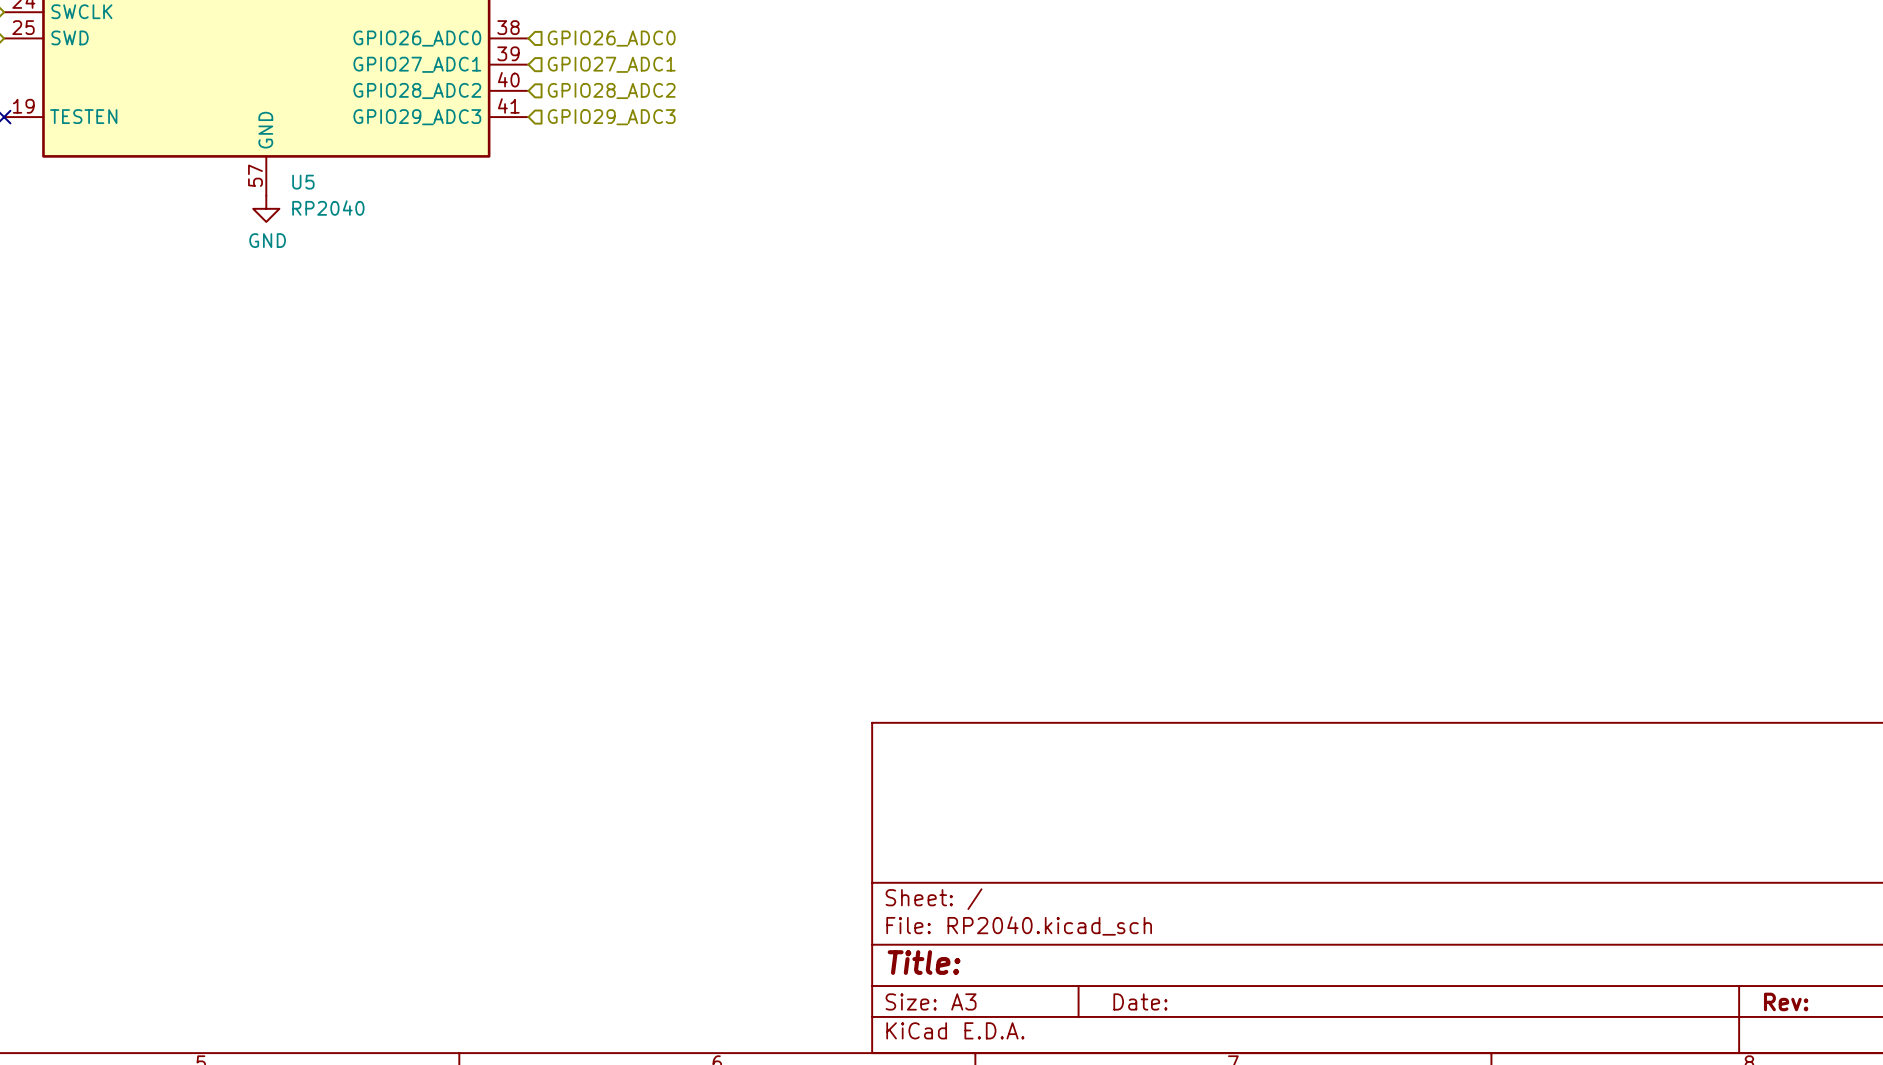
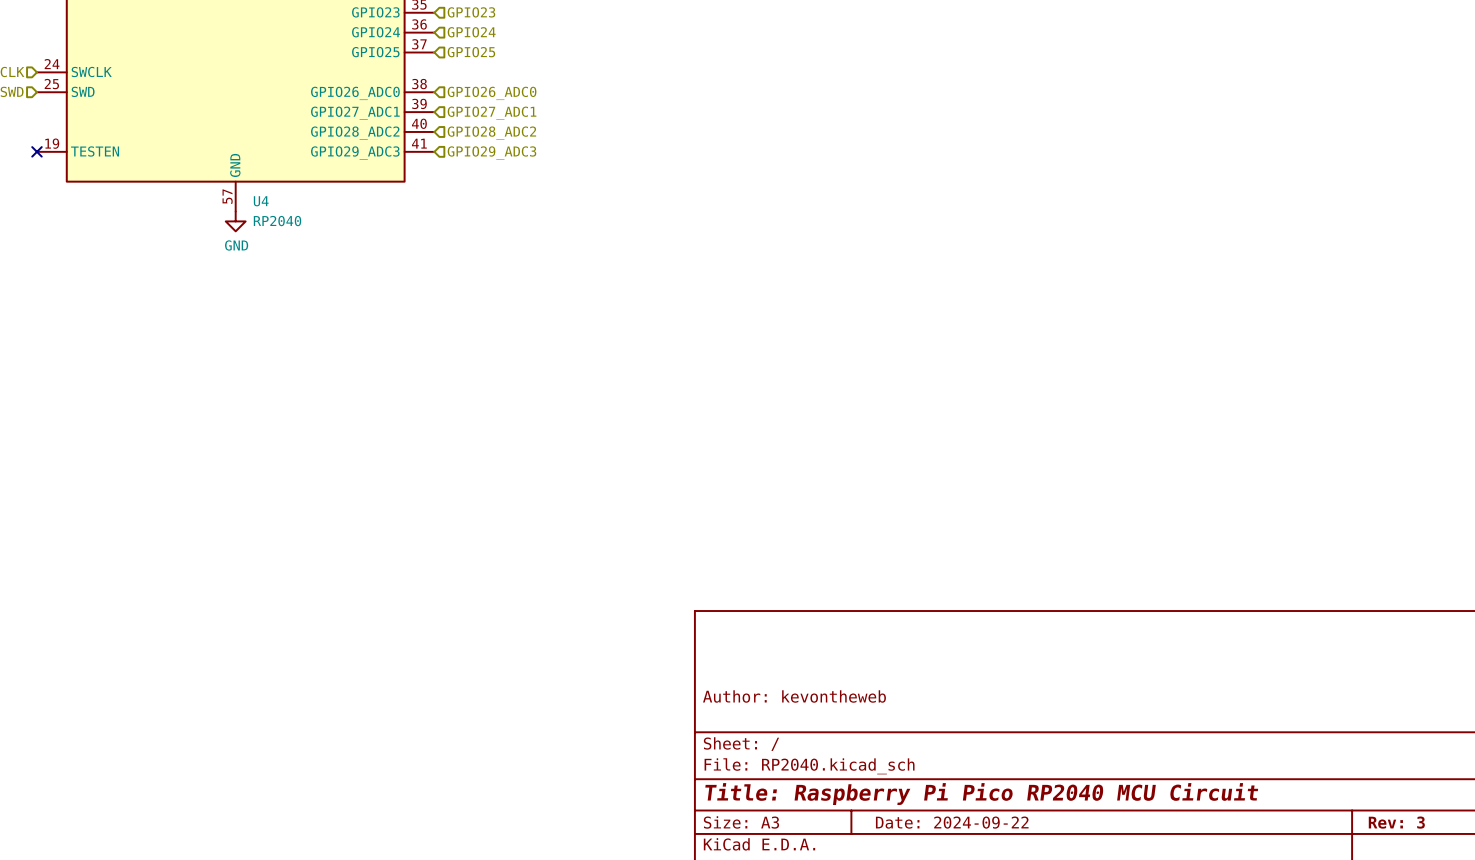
U5 name: U5 (303, 182) -> U4 (261, 201)
title block: none -> Author: kevontheweb (794, 696)
title block: Title: (924, 962) -> Title: Raspberry Pi Pico RP2040 MCU Circuit (981, 794)
title block: Date: (1140, 1001) -> Date: 2024-09-22 (952, 822)
title block: Rev: (1786, 1001) -> Rev: 3 (1396, 822)

